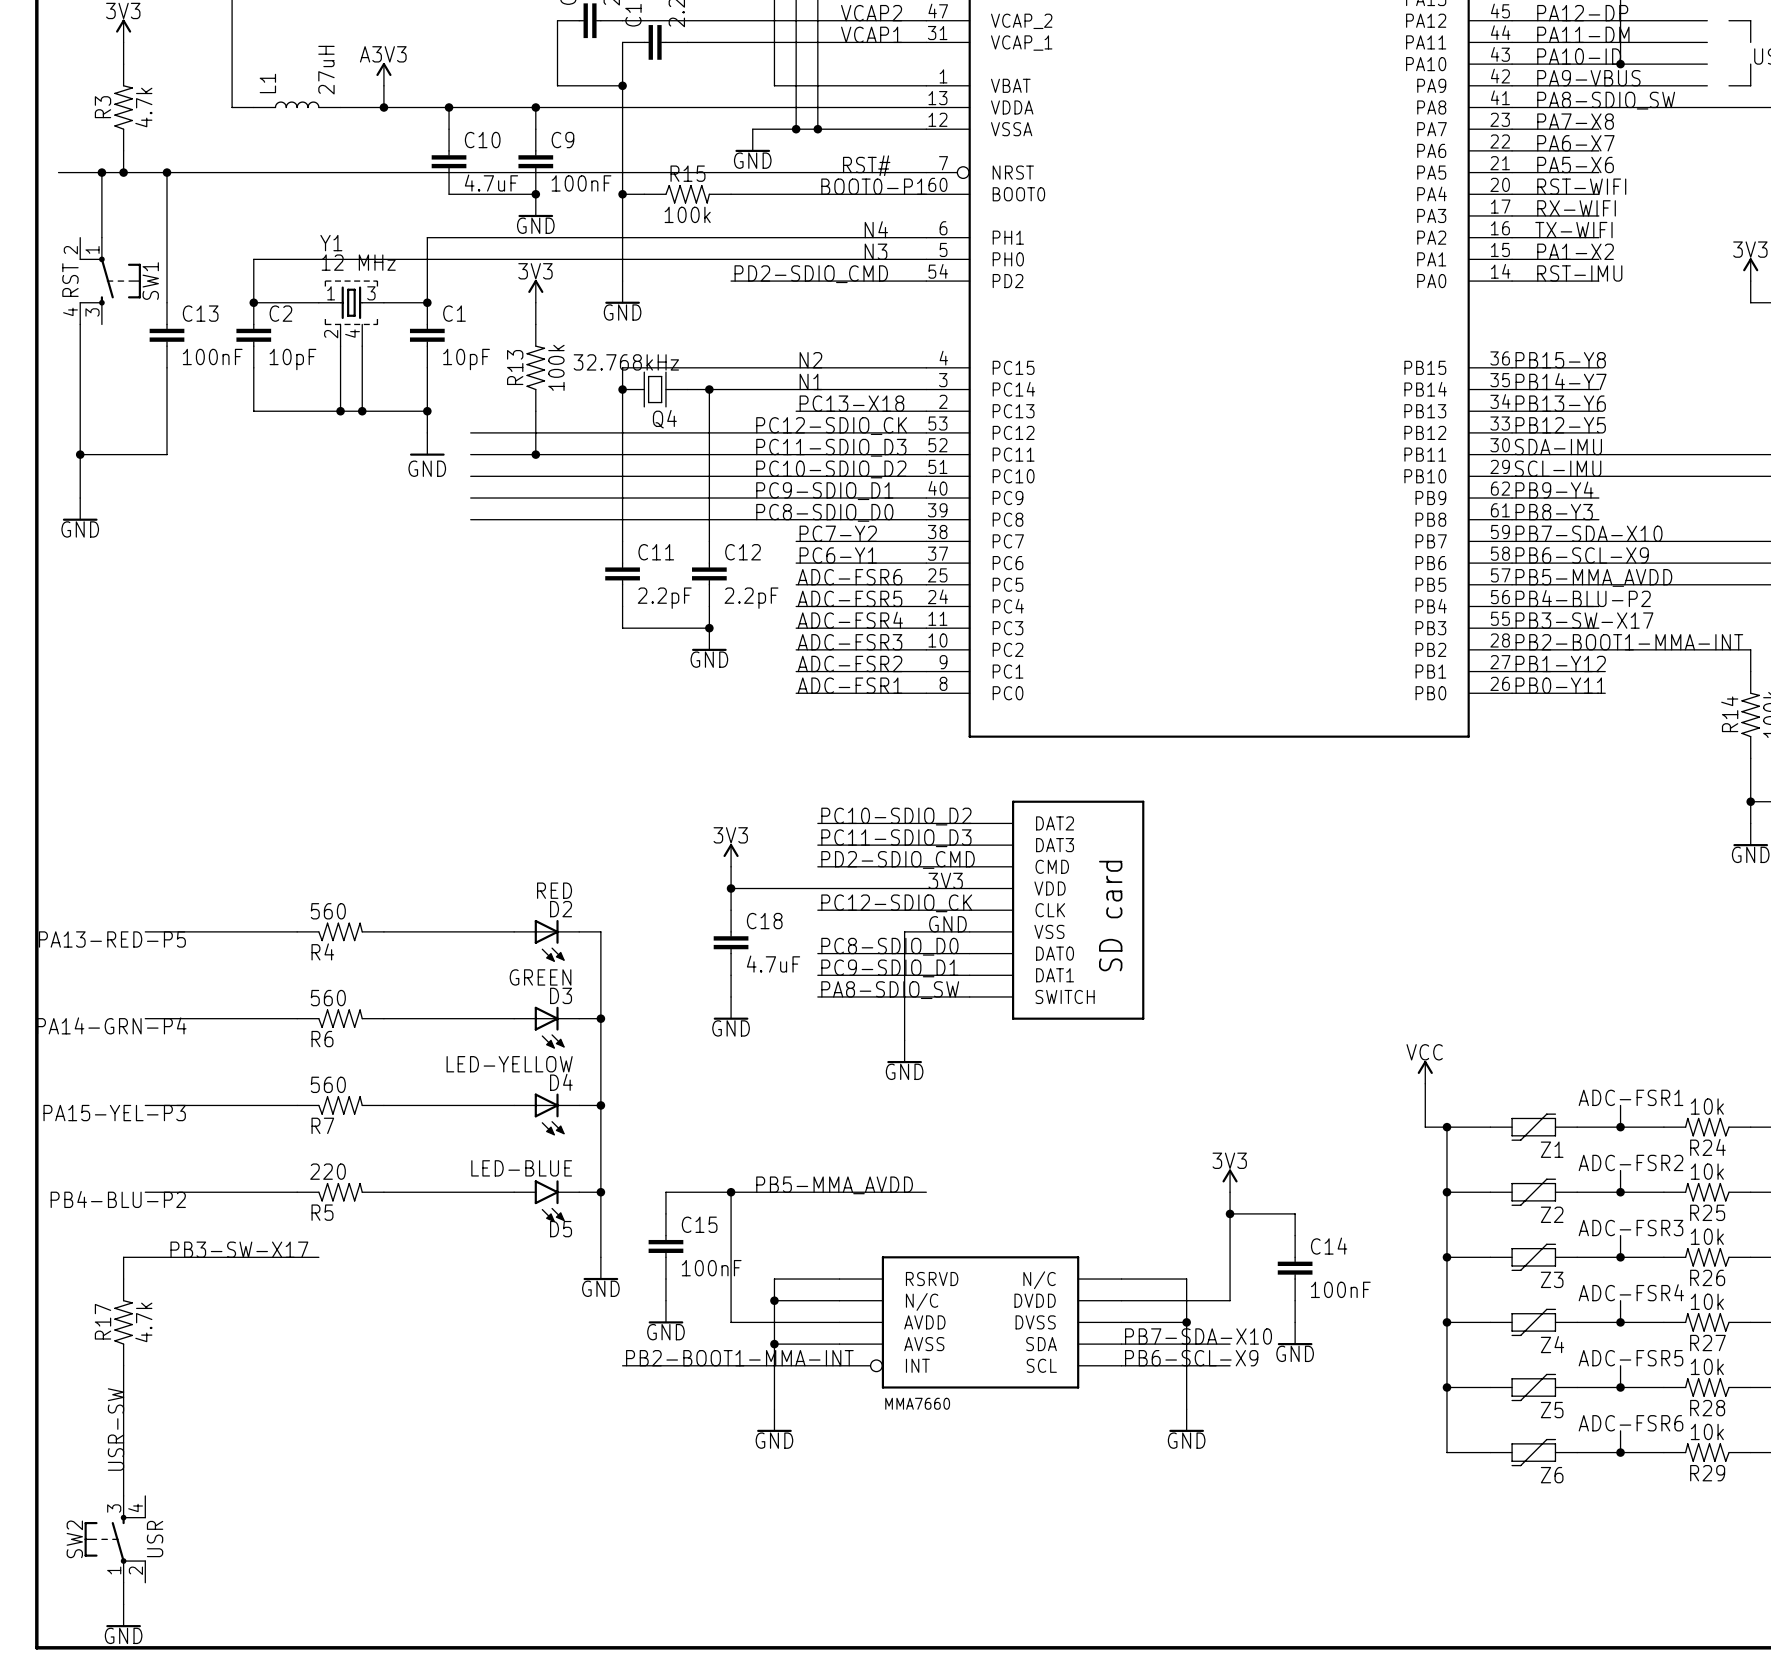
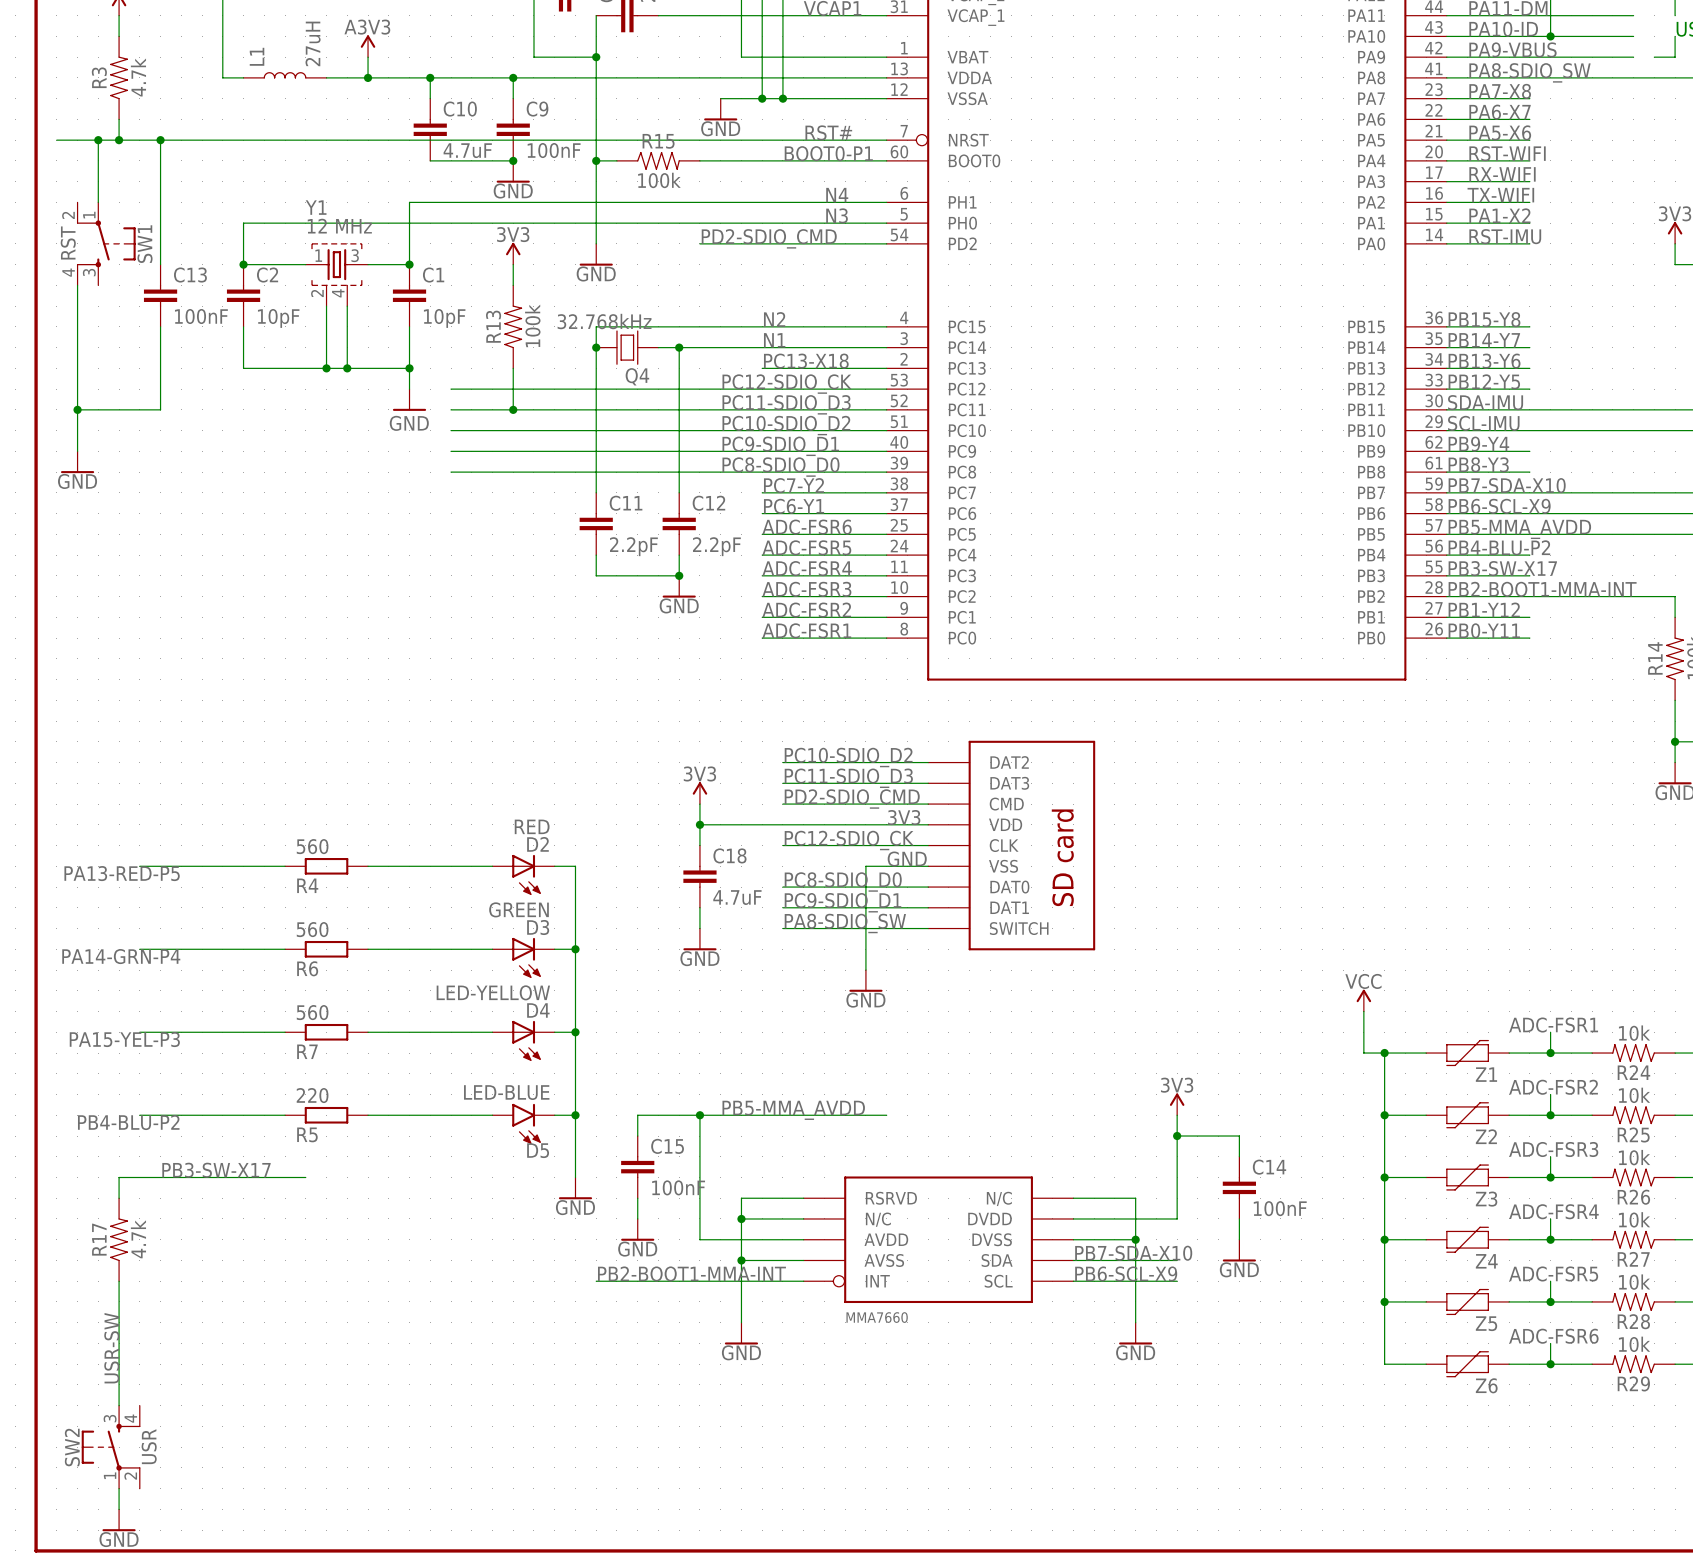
R4 symbol: [297, 922, 384, 942] -> [285, 857, 369, 875]
R6 symbol: [297, 1009, 384, 1029] -> [285, 940, 369, 958]
R7 symbol: [297, 1096, 384, 1115] -> [285, 1023, 369, 1041]
R5 symbol: [297, 1182, 384, 1202] -> [285, 1106, 369, 1124]

